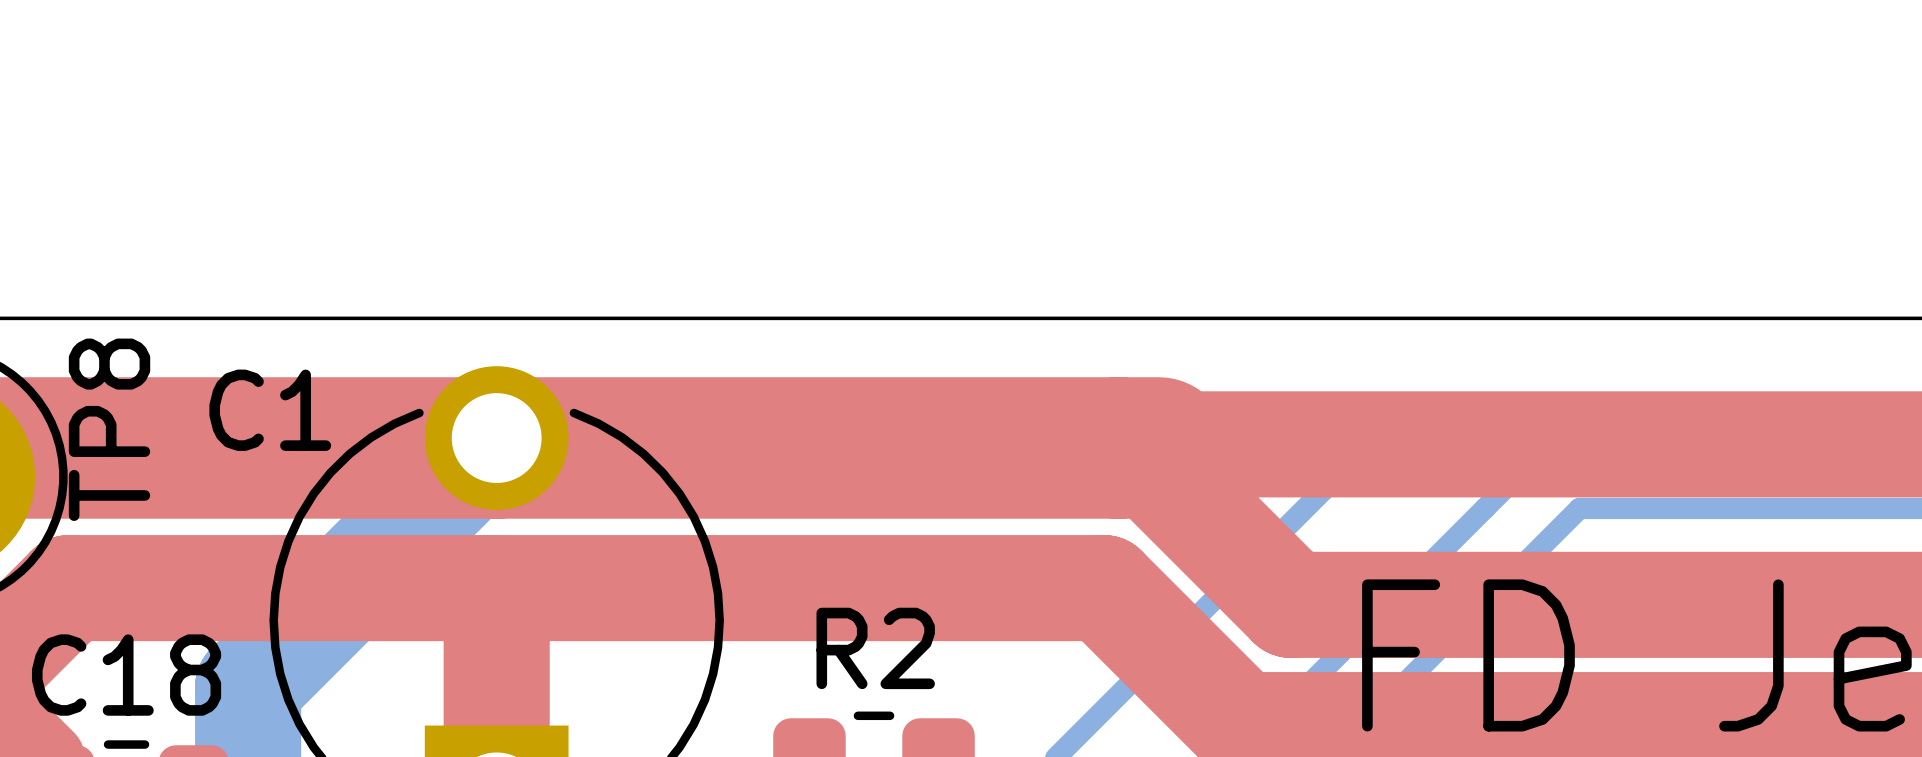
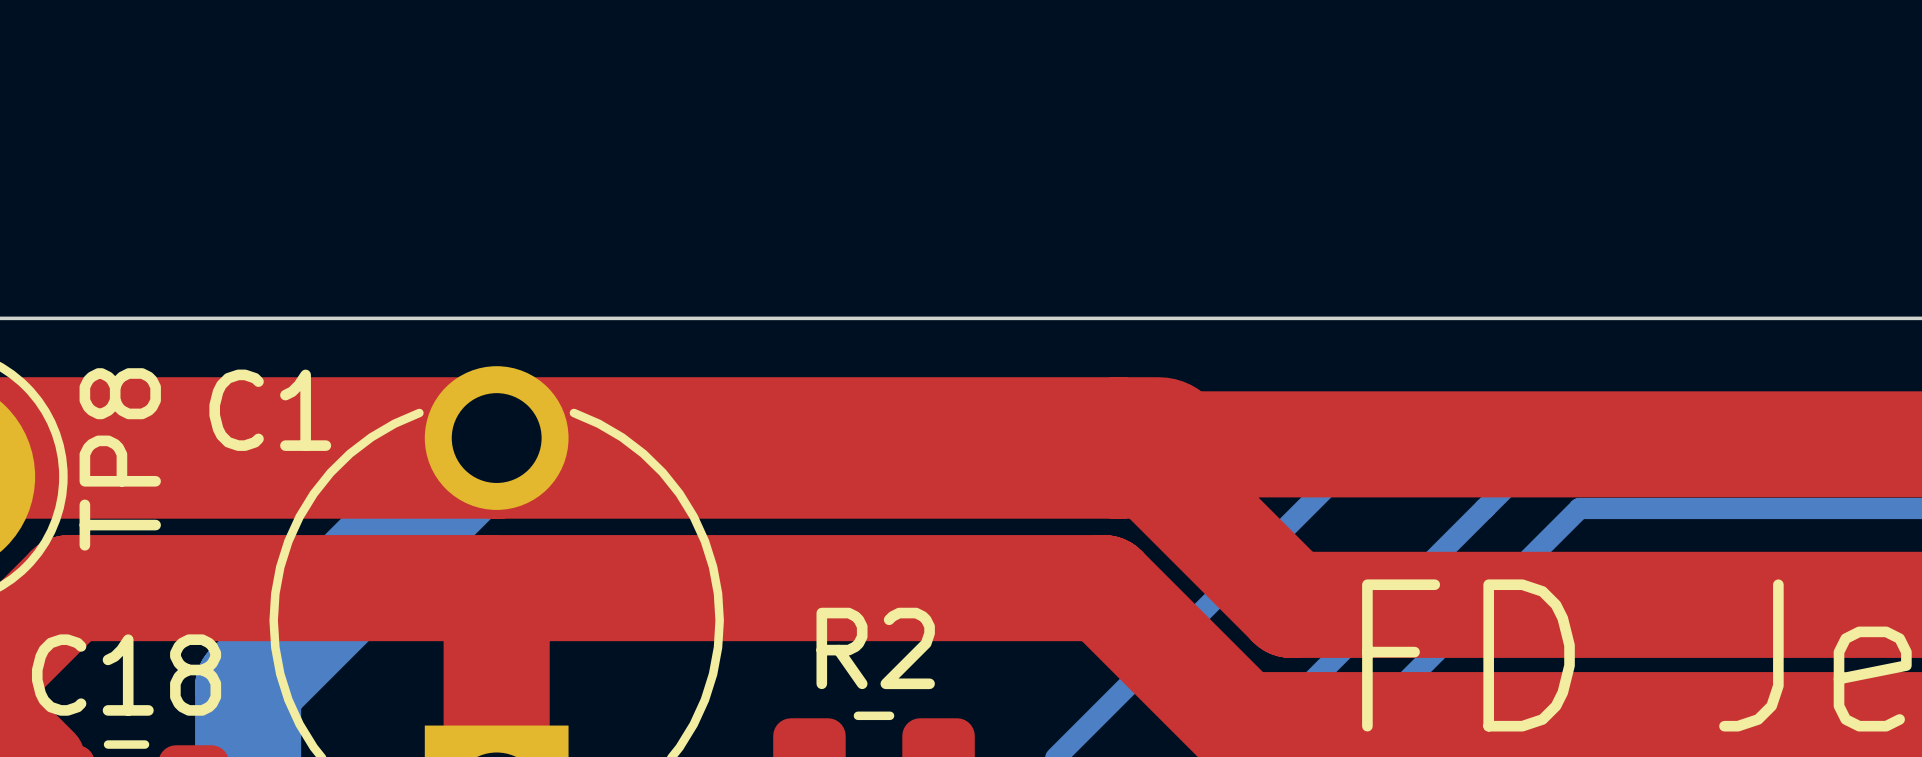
TP8 name position: TP8 (109, 429) -> TP8 (120, 459)

